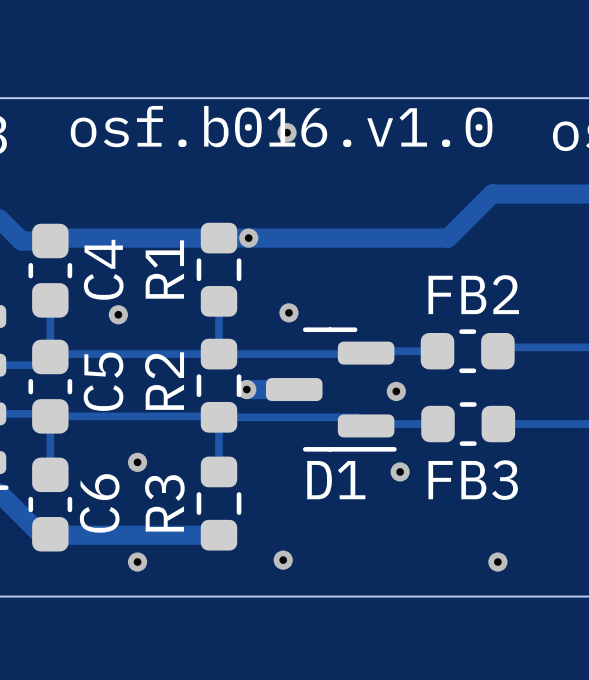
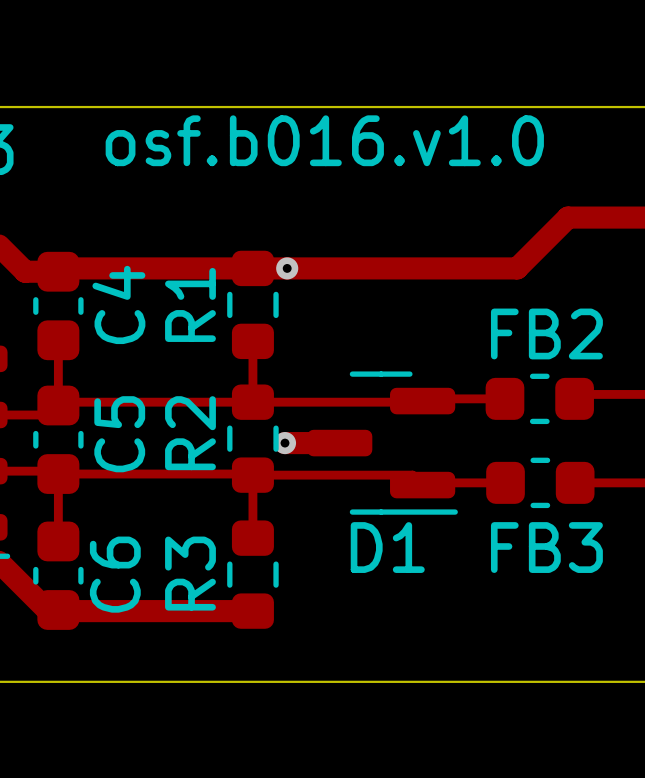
via: (287, 132) -> none
via: (288, 312) -> none
via: (118, 314) -> none
via: (396, 391) -> none
via: (137, 462) -> none
via: (400, 471) -> none
via: (283, 560) -> none
via: (137, 562) -> none
via: (497, 562) -> none

